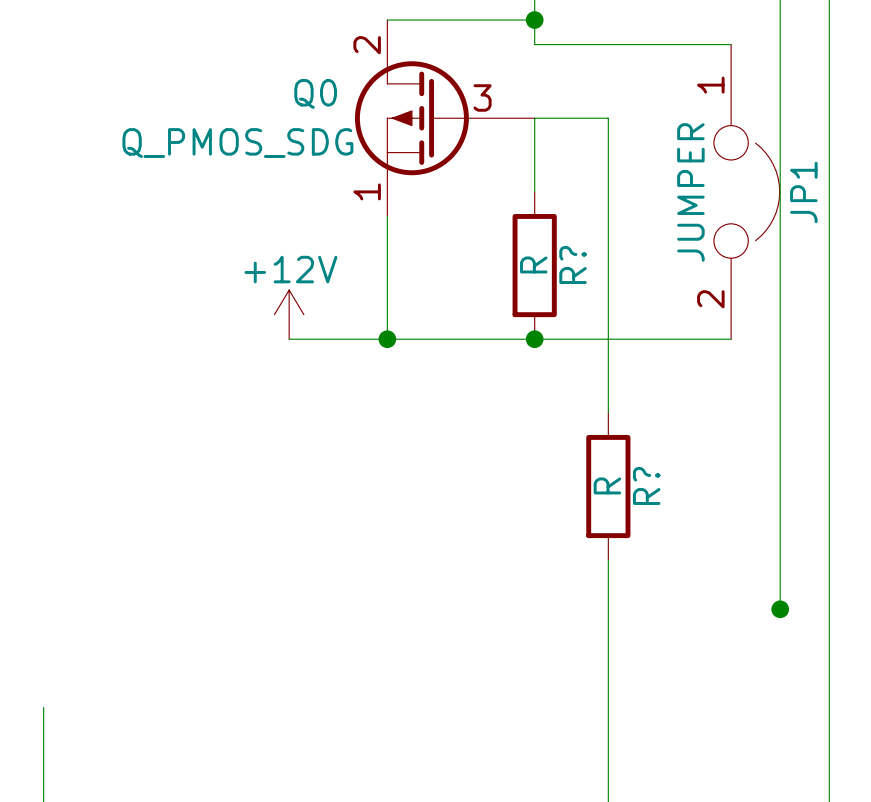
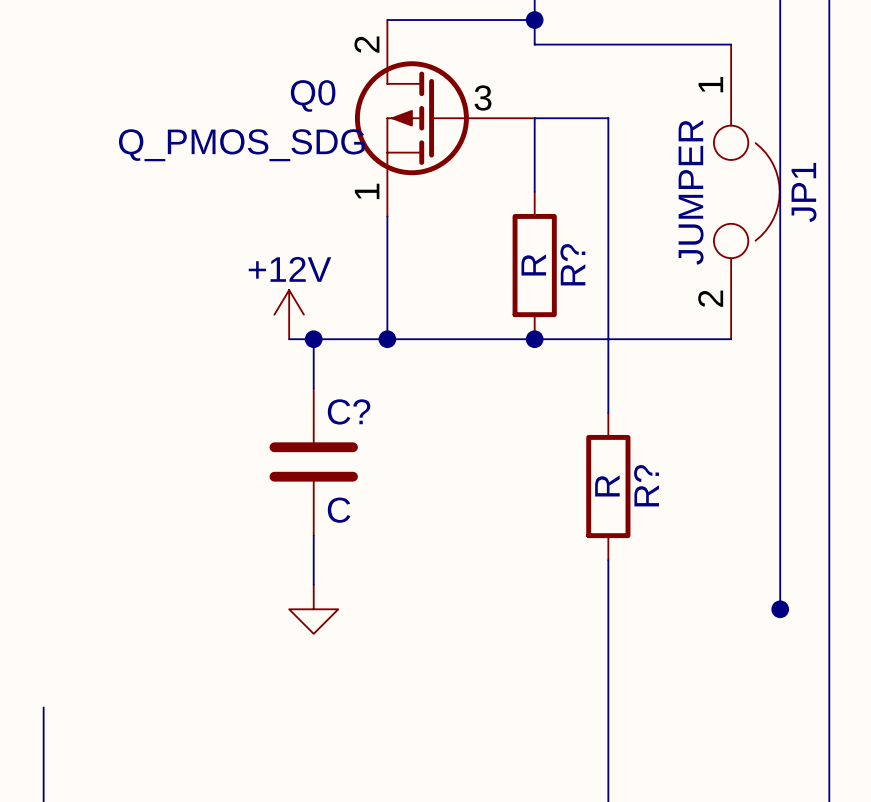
wire: none -> (313, 339) (313, 388)
junction: none -> (313, 339)
C?: none -> C (313, 461)
wire: none -> (313, 535) (313, 584)
power symbol: none -> (313, 609)

